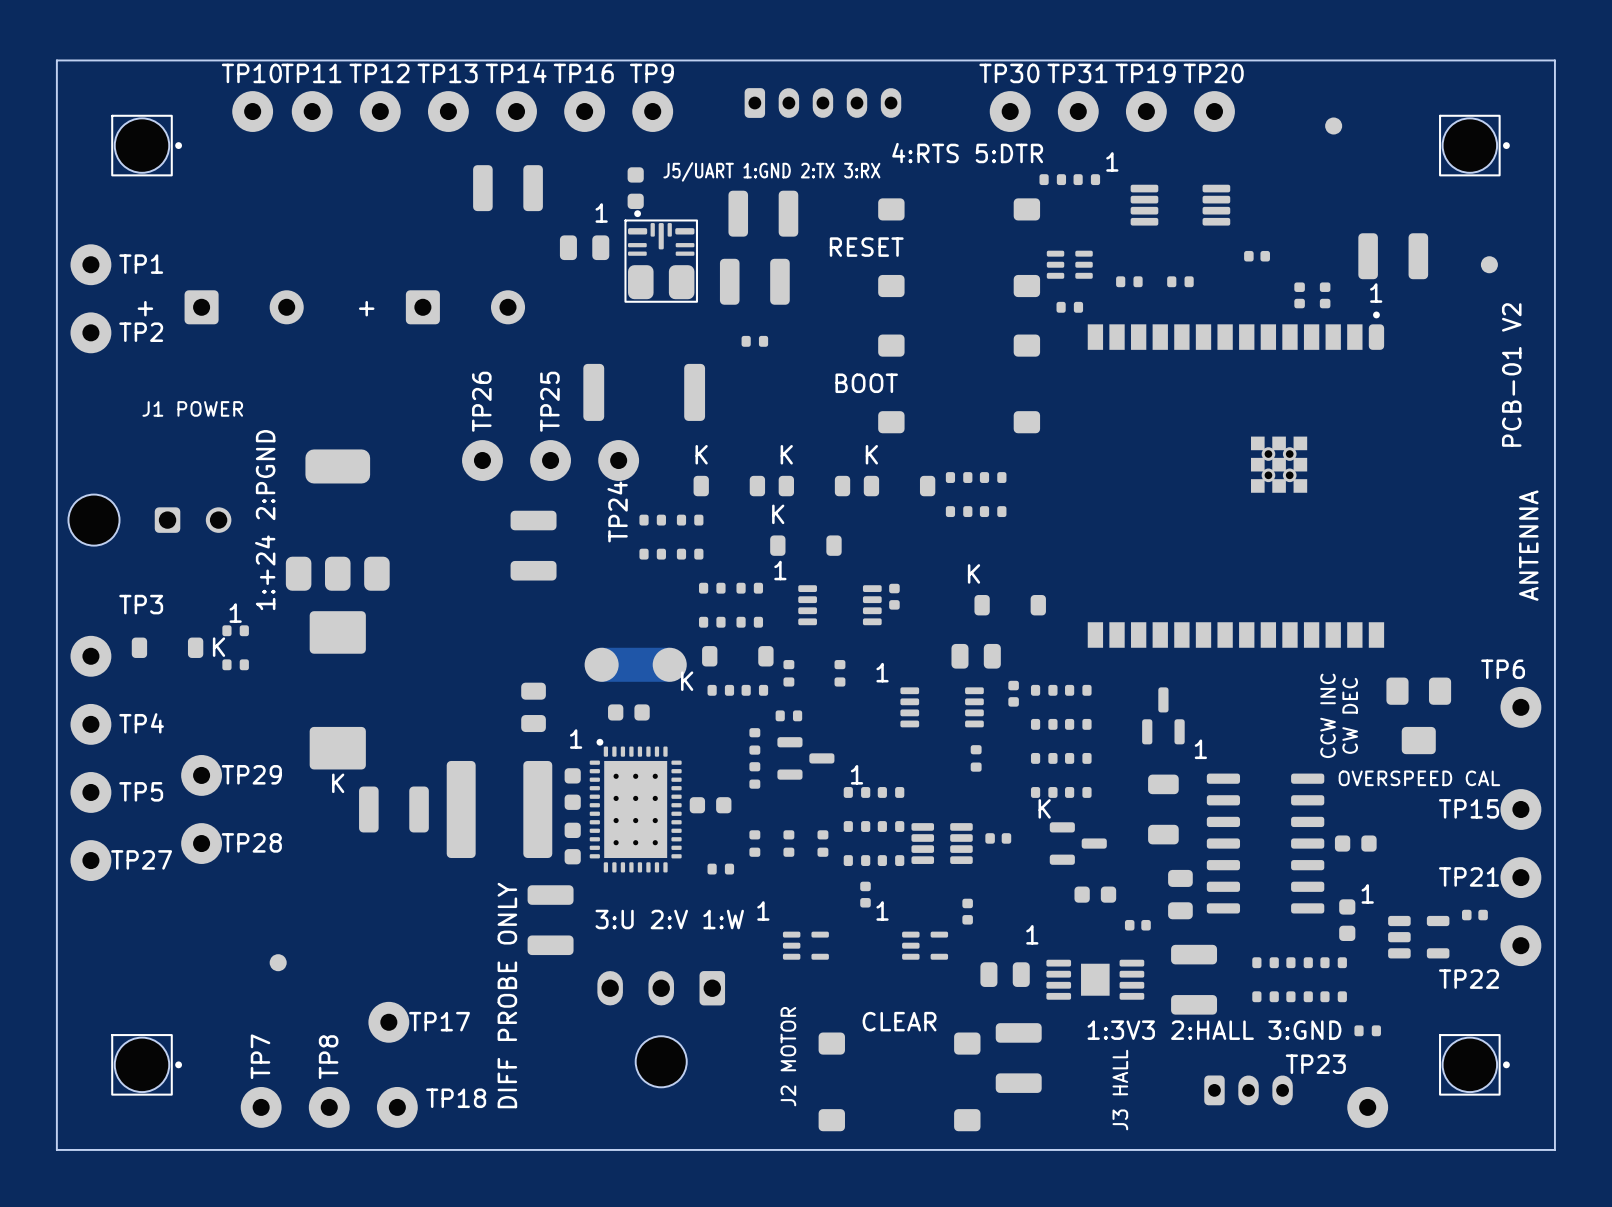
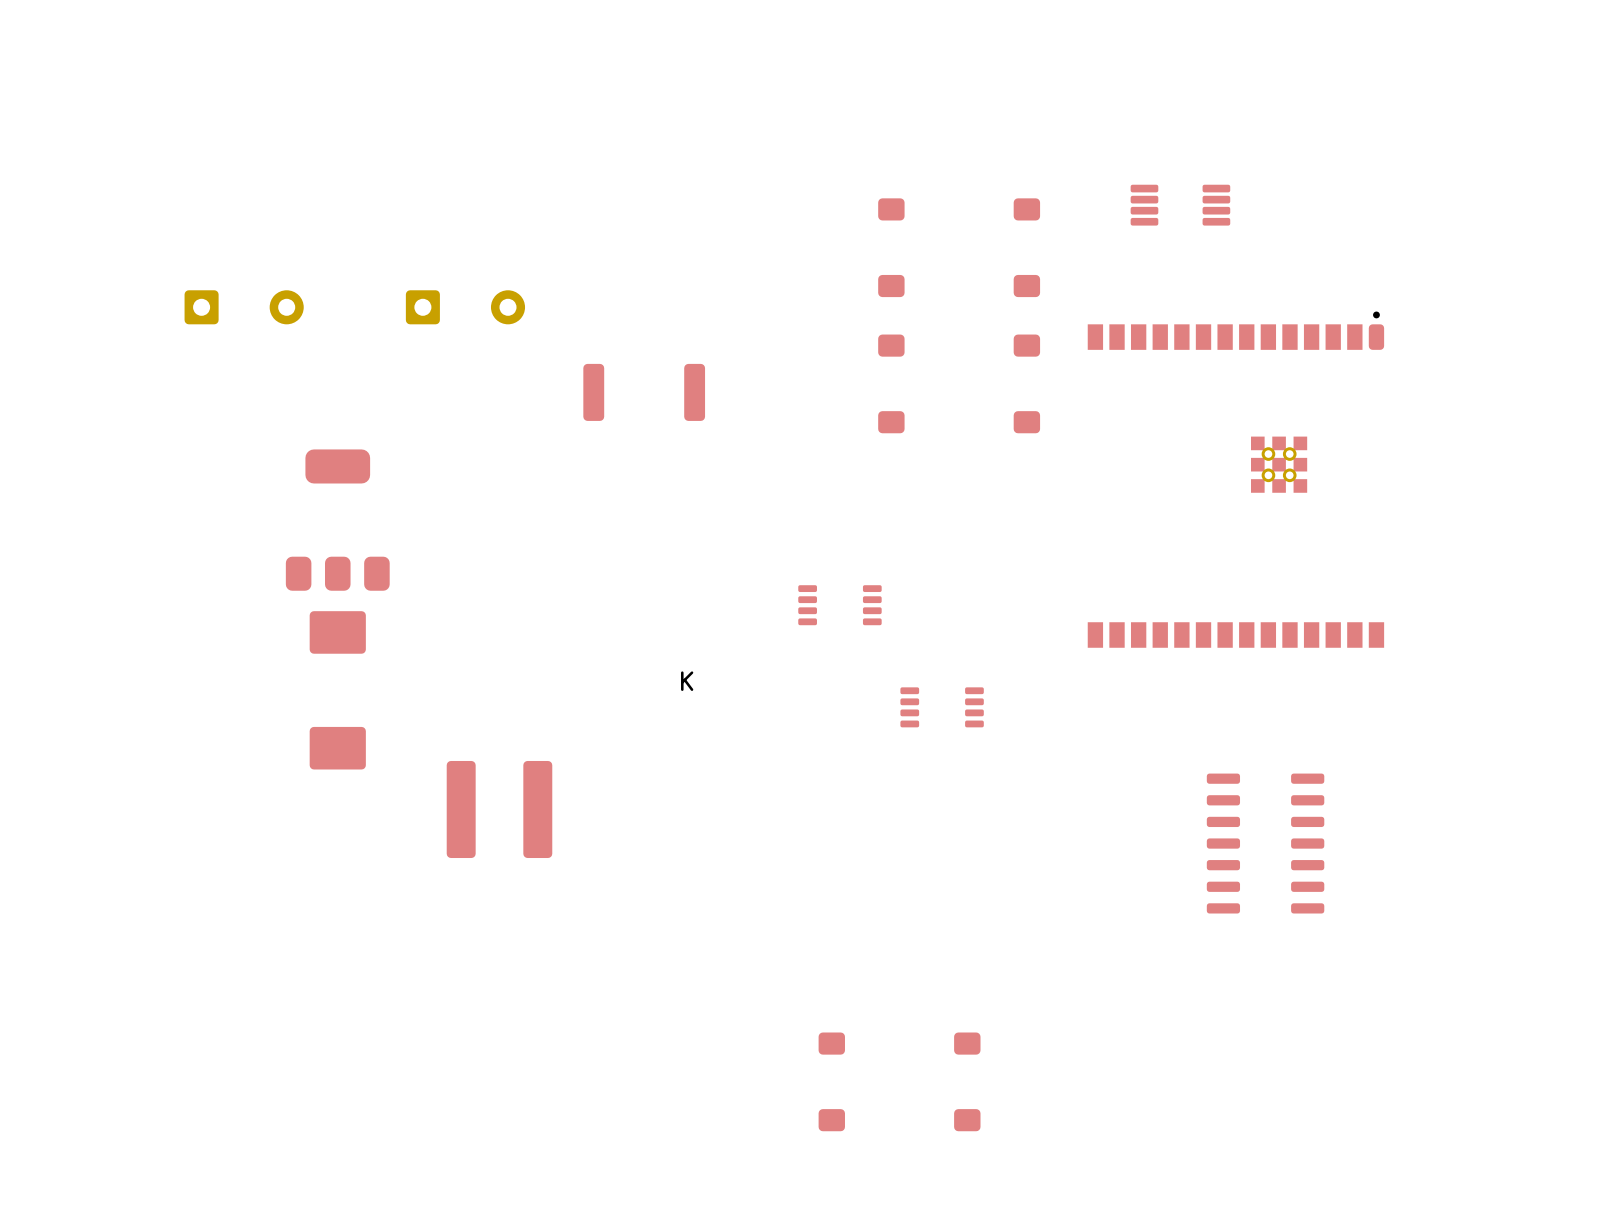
board edge: (56, 60) (1554, 60) (1554, 1149) (56, 1149) (56, 60) -> none
text: TP10 (251, 73) -> none
text: TP11 (311, 73) -> none
text: TP12 (379, 73) -> none
text: TP13 (447, 73) -> none
text: TP14 (516, 73) -> none
text: TP16 (583, 73) -> none
text: TP9 (651, 73) -> none
text: TP30 (1009, 73) -> none
text: TP31 (1077, 73) -> none
text: TP19 (1145, 73) -> none
text: TP20 (1213, 73) -> none
part: (822, 103) -> none
part: (252, 111) -> none
part: (312, 111) -> none
part: (380, 111) -> none
part: (448, 111) -> none
part: (516, 111) -> none
part: (584, 111) -> none
part: (652, 111) -> none
part: (1010, 111) -> none
part: (1078, 111) -> none
part: (1146, 111) -> none
part: (1214, 111) -> none
part: (1333, 125) -> none
part: (146, 145) -> none
part: (1474, 145) -> none
text: 4:RTS 5:DTR (967, 153) -> none
text: 1 (1112, 161) -> none
text: J5/UART 1:GND 2:TX 3:RX (771, 171) -> none
part: (1052, 179) -> none
part: (1086, 179) -> none
part: (508, 188) -> none
part: (635, 188) -> none
text: 1 (601, 213) -> none
part: (763, 213) -> none
part: (584, 247) -> none
text: RESET (866, 247) -> none
part: (661, 256) -> none
part: (1257, 256) -> none
part: (1393, 256) -> none
part: (90, 264) -> none
text: TP1 (141, 264) -> none
part: (1069, 264) -> none
part: (1489, 264) -> none
part: (754, 281) -> none
part: (1129, 281) -> none
part: (1180, 281) -> none
text: 1 (1376, 293) -> none
part: (1299, 295) -> none
part: (1325, 295) -> none
part: (1069, 307) -> none
text: + (145, 308) -> none
text: + (366, 308) -> none
part: (90, 332) -> none
text: TP2 (141, 332) -> none
part: (754, 341) -> none
text: PCB-01 V2 (1511, 374) -> none
text: BOOT (866, 383) -> none
text: TP26 (481, 401) -> none
text: TP25 (549, 401) -> none
text: J1 POWER (192, 408) -> none
text: K (701, 454) -> none
text: K (786, 454) -> none
text: K (871, 454) -> none
part: (482, 460) -> none
part: (550, 460) -> none
part: (618, 460) -> none
part: (959, 477) -> none
part: (993, 477) -> none
part: (729, 486) -> none
part: (814, 486) -> none
part: (899, 486) -> none
text: TP24 (617, 511) -> none
part: (959, 511) -> none
part: (993, 511) -> none
text: K (778, 514) -> none
part: (149, 520) -> none
text: 1:+24 2:PGND (265, 520) -> none
part: (652, 520) -> none
part: (690, 520) -> none
part: (533, 545) -> none
part: (805, 545) -> none
text: ANTENNA (1528, 545) -> none
part: (652, 554) -> none
part: (690, 554) -> none
text: 1 (780, 570) -> none
text: K (974, 573) -> none
part: (712, 588) -> none
part: (749, 588) -> none
part: (894, 596) -> none
text: TP3 (141, 604) -> none
part: (1010, 605) -> none
text: 1 (235, 613) -> none
part: (712, 622) -> none
part: (749, 622) -> none
part: (235, 630) -> none
part: (167, 647) -> none
text: K (219, 647) -> none
part: (90, 656) -> none
part: (737, 656) -> none
part: (976, 656) -> none
part: (235, 664) -> none
part: (635, 664) -> none
text: TP6 (1503, 669) -> none
text: 1 (882, 672) -> none
part: (788, 673) -> none
part: (839, 673) -> none
part: (720, 690) -> none
part: (754, 690) -> none
part: (1044, 690) -> none
part: (1078, 690) -> none
part: (1013, 693) -> none
part: (533, 707) -> none
part: (1520, 707) -> none
part: (628, 712) -> none
part: (788, 715) -> none
part: (1163, 715) -> none
text: CCW INC (1328, 715) -> none
text: CW DEC (1350, 715) -> none
part: (1418, 715) -> none
text: TP4 (141, 723) -> none
part: (90, 724) -> none
part: (1044, 724) -> none
part: (1078, 724) -> none
text: 1 (576, 739) -> none
part: (754, 741) -> none
text: 1 (1200, 749) -> none
part: (805, 758) -> none
part: (976, 758) -> none
part: (1044, 758) -> none
part: (1078, 758) -> none
text: TP29 (251, 774) -> none
text: 1 (856, 774) -> none
part: (201, 775) -> none
part: (754, 775) -> none
text: OVERSPEED CAL (1419, 778) -> none
text: K (338, 783) -> none
part: (572, 789) -> none
text: TP5 (141, 791) -> none
part: (90, 792) -> none
part: (856, 792) -> none
part: (891, 792) -> none
part: (1044, 792) -> none
part: (1078, 792) -> none
part: (635, 805) -> none
part: (710, 805) -> none
text: K (1044, 808) -> none
text: TP15 (1469, 808) -> none
part: (393, 809) -> none
part: (1163, 809) -> none
part: (1520, 809) -> none
part: (856, 826) -> none
part: (891, 826) -> none
part: (998, 838) -> none
text: TP28 (251, 842) -> none
part: (201, 843) -> none
part: (572, 843) -> none
part: (754, 843) -> none
part: (788, 843) -> none
part: (822, 843) -> none
part: (942, 843) -> none
part: (1078, 843) -> none
part: (1355, 843) -> none
text: TP27 (141, 859) -> none
part: (90, 860) -> none
part: (856, 860) -> none
part: (891, 860) -> none
part: (720, 869) -> none
text: TP21 (1469, 876) -> none
part: (1520, 877) -> none
text: 1 (1367, 893) -> none
part: (865, 894) -> none
part: (1095, 894) -> none
part: (1180, 894) -> none
text: 1 (763, 911) -> none
text: 1 (882, 911) -> none
part: (967, 911) -> none
part: (1474, 915) -> none
text: 3:U 2:V 1:W (669, 919) -> none
part: (550, 920) -> none
part: (1347, 920) -> none
part: (1137, 925) -> none
text: 1 (1032, 934) -> none
part: (1418, 937) -> none
part: (805, 945) -> none
part: (925, 945) -> none
part: (1520, 945) -> none
part: (278, 962) -> none
part: (1265, 962) -> none
part: (1299, 962) -> none
part: (1333, 962) -> none
part: (1005, 974) -> none
part: (1095, 979) -> none
part: (1194, 979) -> none
text: TP22 (1469, 979) -> none
text: DIFF PROBE ONLY (507, 995) -> none
part: (1265, 996) -> none
part: (1299, 996) -> none
part: (1333, 996) -> none
text: TP17 (439, 1021) -> none
text: CLEAR (899, 1021) -> none
part: (388, 1022) -> none
part: (661, 1029) -> none
text: 1:3V3 2:HALL 3:GND (1214, 1030) -> none
part: (1367, 1030) -> none
text: TP7 (260, 1056) -> none
text: J2 MOTOR (788, 1056) -> none
text: TP8 (328, 1057) -> none
part: (1018, 1058) -> none
part: (146, 1064) -> none
text: TP23 (1315, 1064) -> none
part: (1474, 1064) -> none
text: J3 HALL (1120, 1090) -> none
part: (1248, 1090) -> none
text: TP18 (456, 1098) -> none
part: (261, 1107) -> none
part: (329, 1107) -> none
part: (397, 1107) -> none
part: (1367, 1107) -> none

